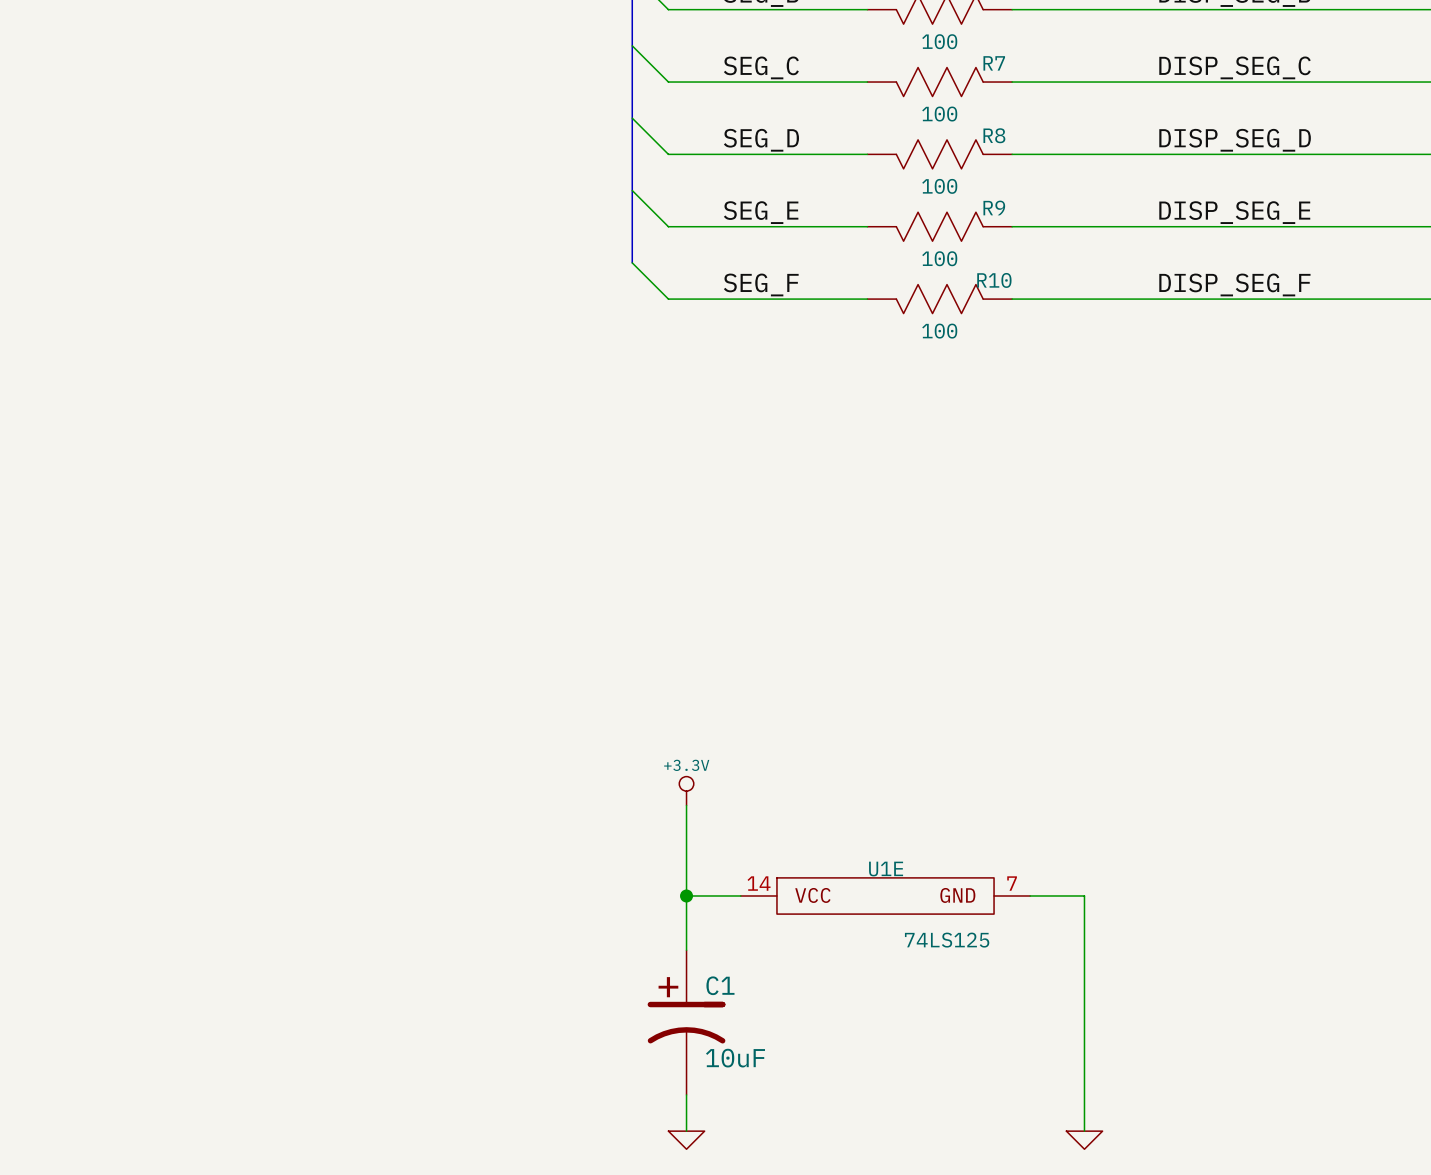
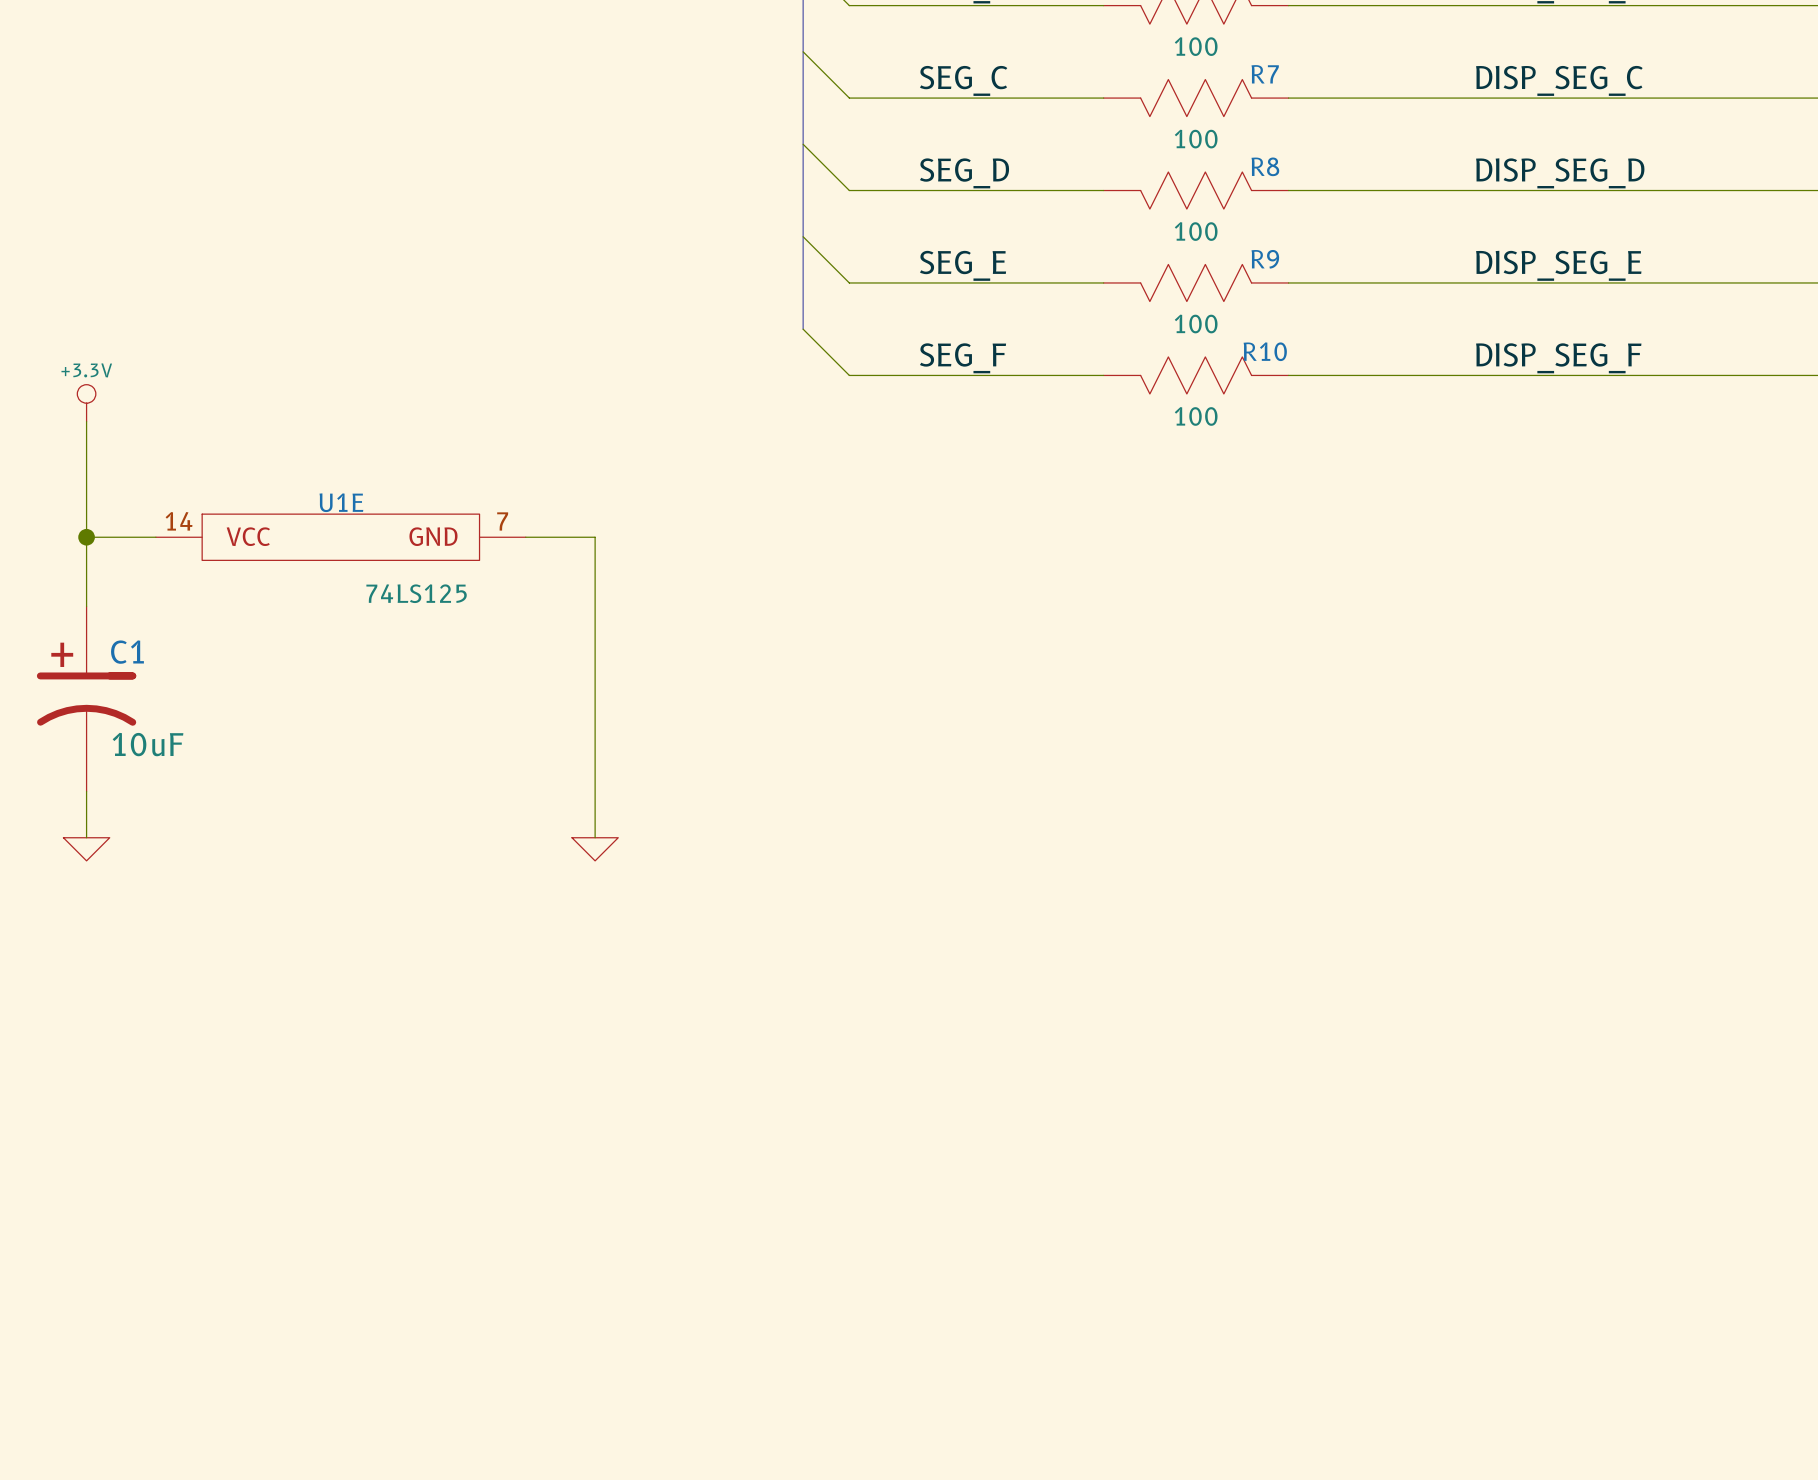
power symbol: none -> +3.3V (86, 403)
wire: none -> (86, 421) (86, 606)
wire: none -> (86, 537) (155, 537)
junction: none -> (86, 537)
wire: none -> (525, 537) (595, 537) (595, 837)
wire: none -> (86, 791) (86, 837)
power symbol: none -> (86, 849)
power symbol: none -> (595, 849)
power symbol: +3.3V (686, 791) -> none
wire: (686, 805) (686, 950) -> none
wire: (686, 895) (740, 895) -> none
junction: (686, 895) -> none
U1E position: (885, 895) -> (340, 537)
wire: (1030, 895) (1084, 895) (1084, 1131) -> none
C1 position: (686, 1022) -> (86, 699)
wire: (686, 1094) (686, 1131) -> none
power symbol: (686, 1140) -> none
power symbol: (1084, 1140) -> none

